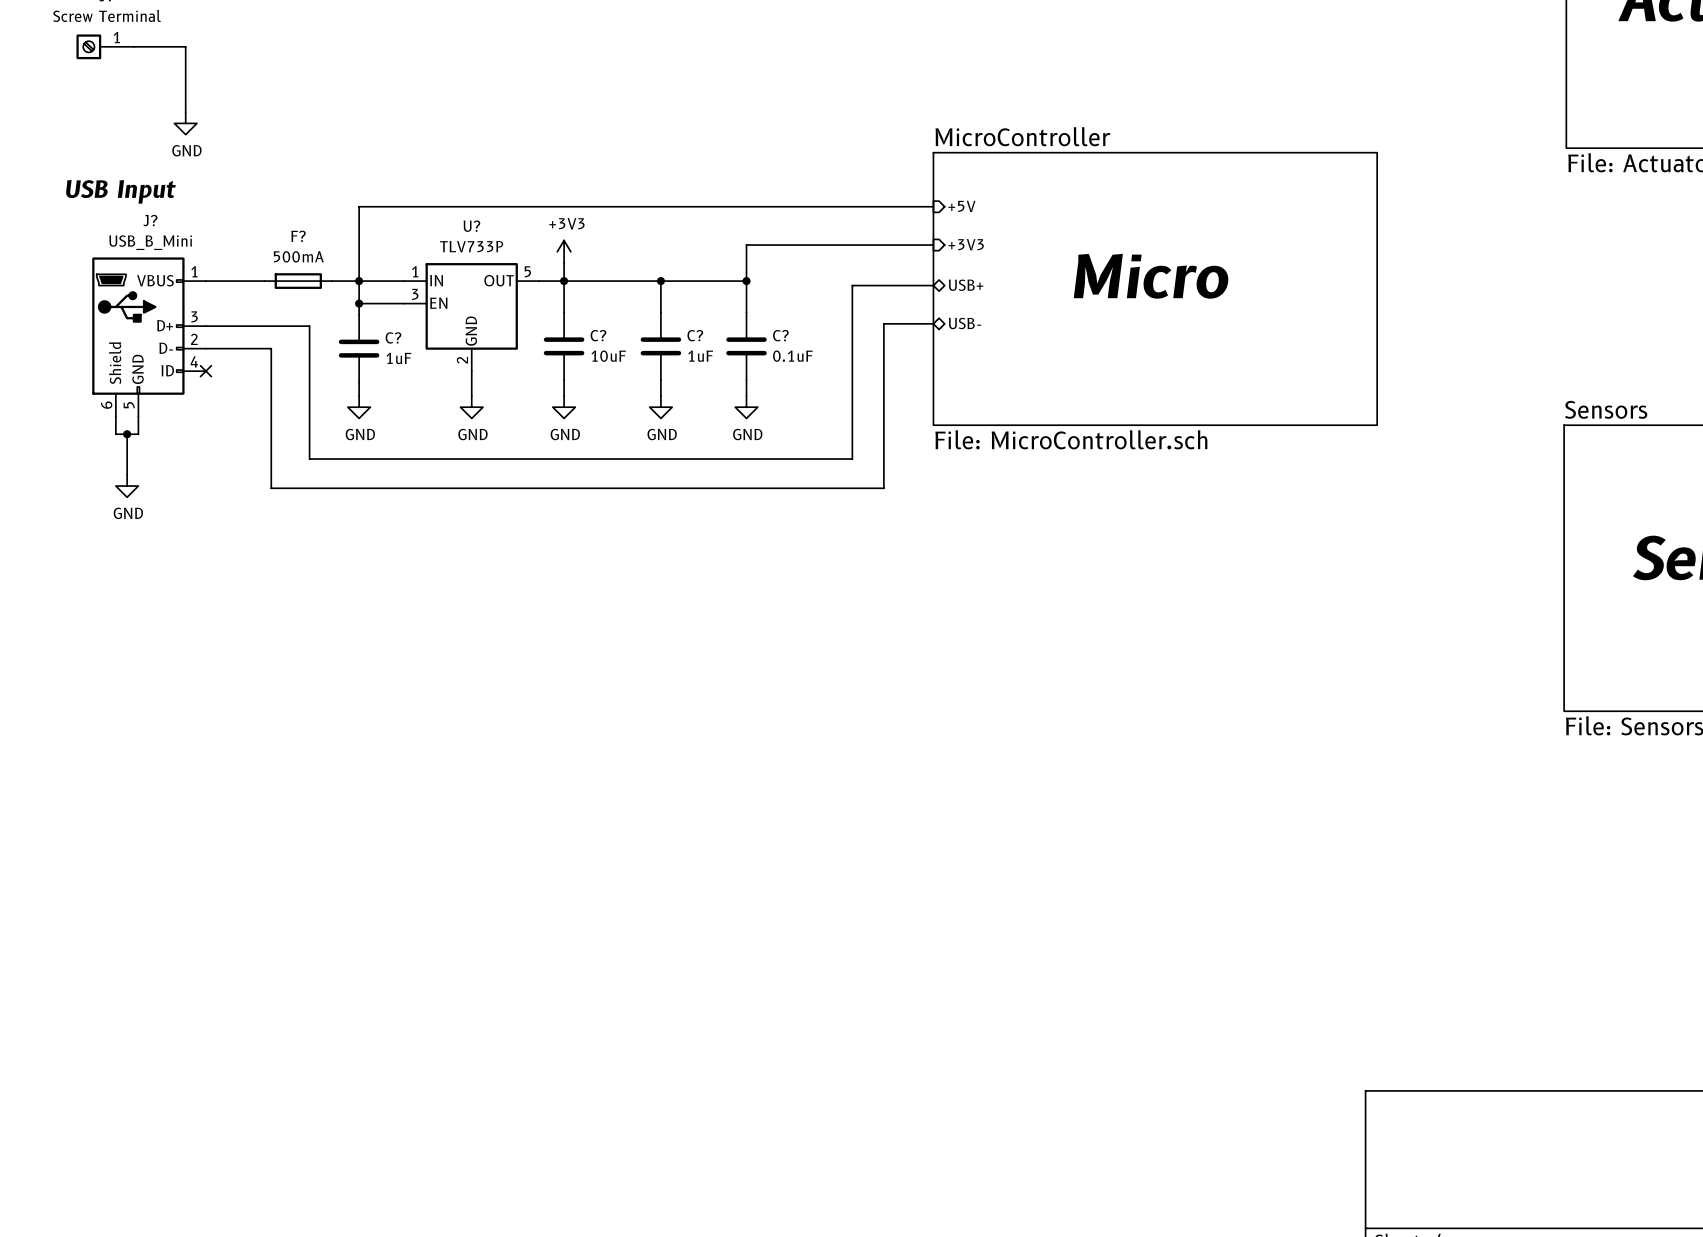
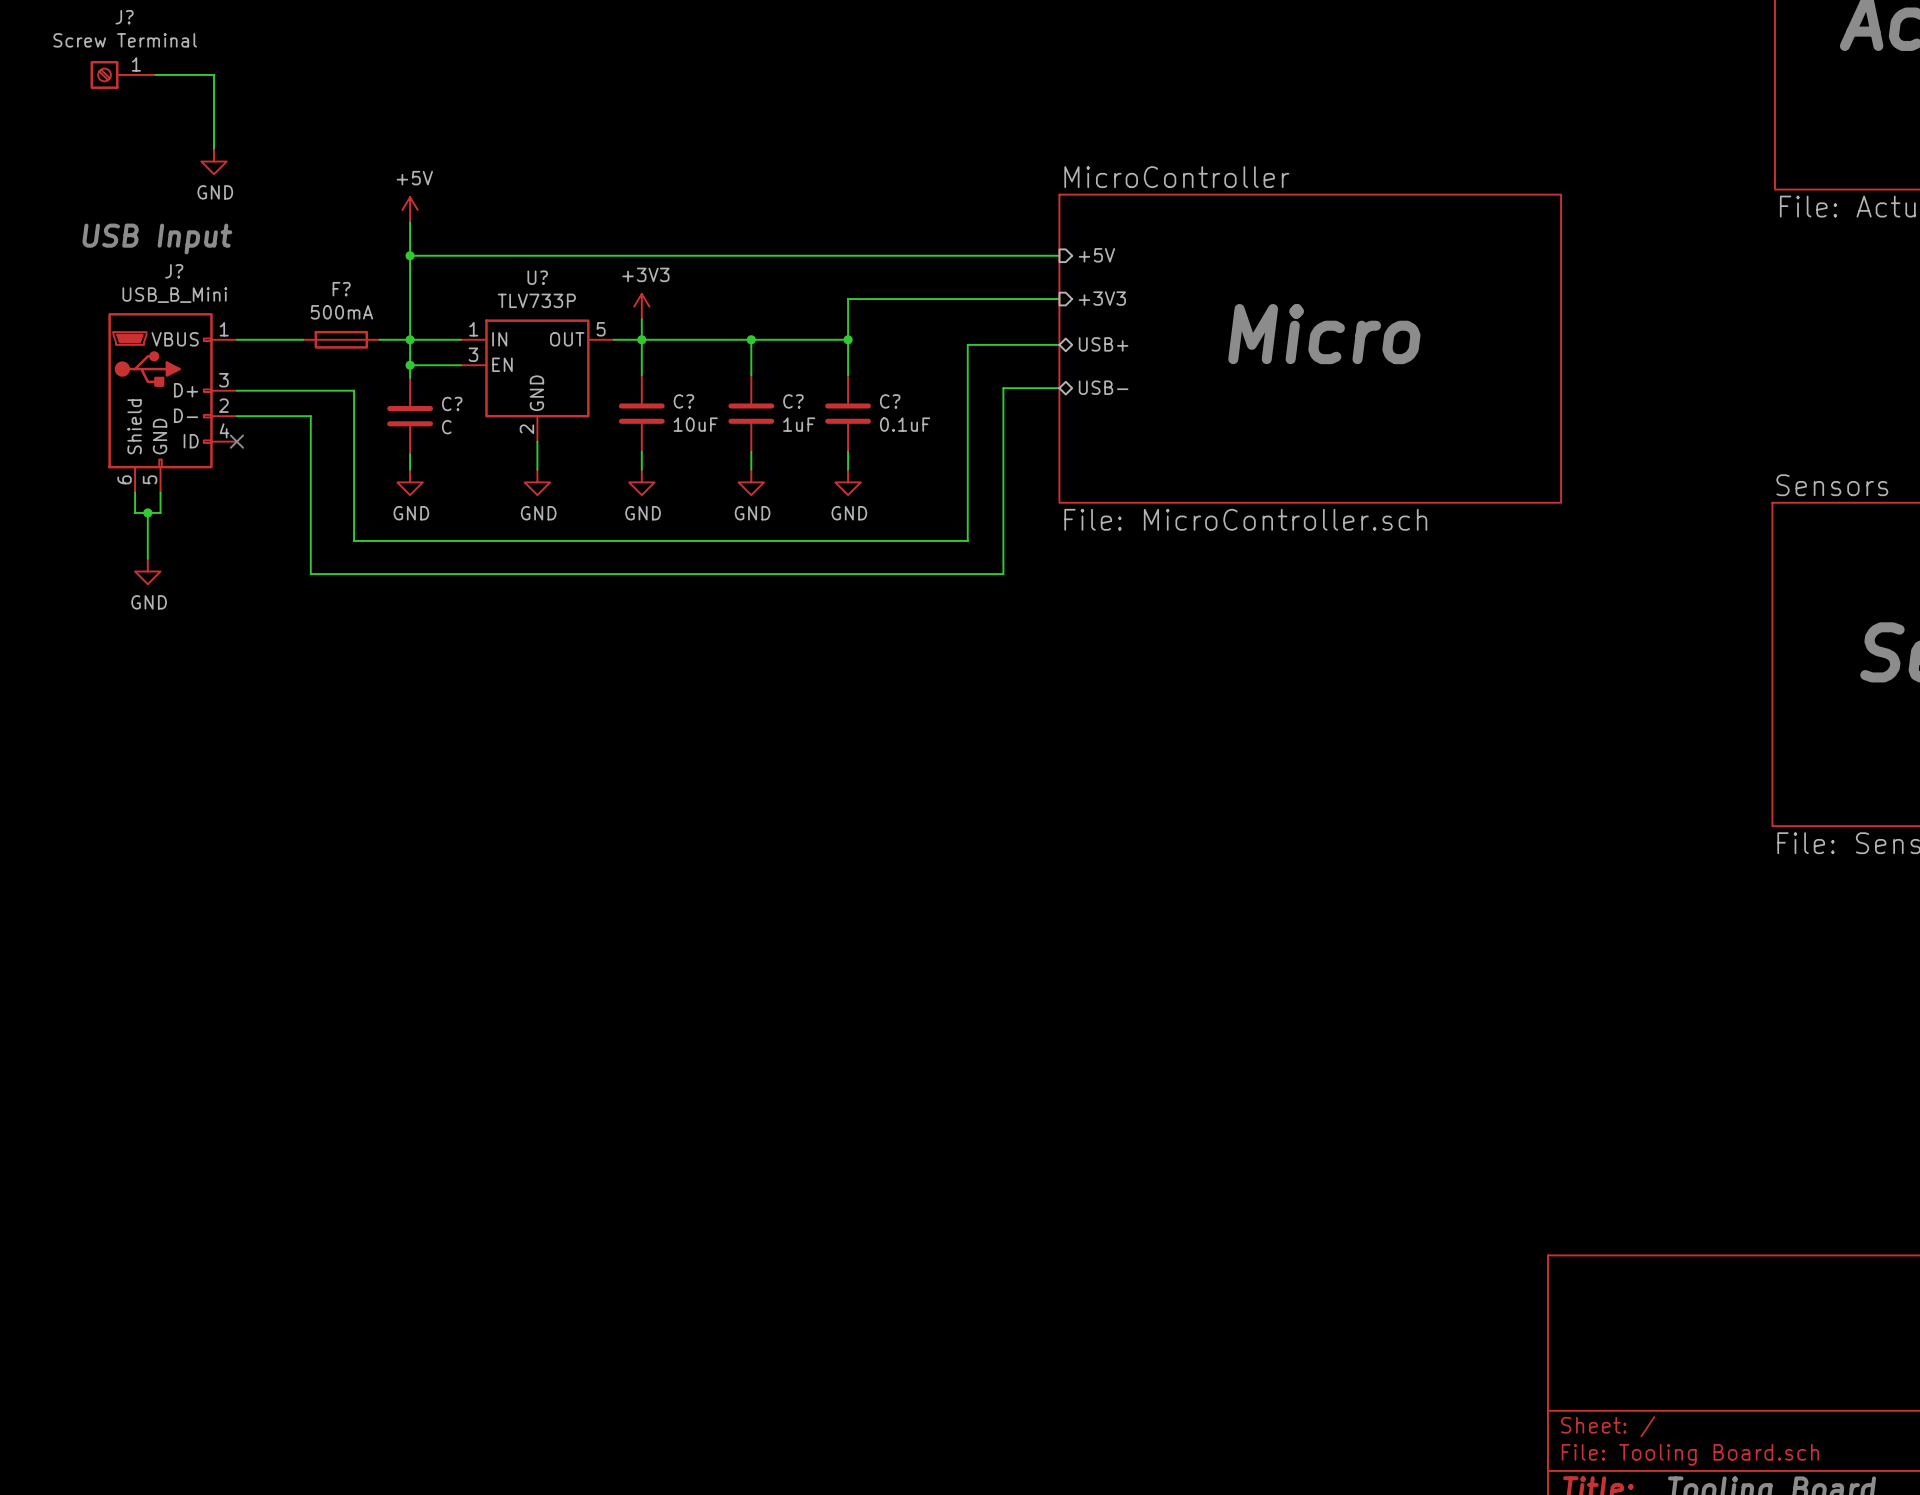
power symbol: none -> +5V (410, 209)
wire: none -> (410, 222) (410, 255)
junction: none -> (410, 255)
C? value: 1uF (398, 358) -> C (446, 427)

